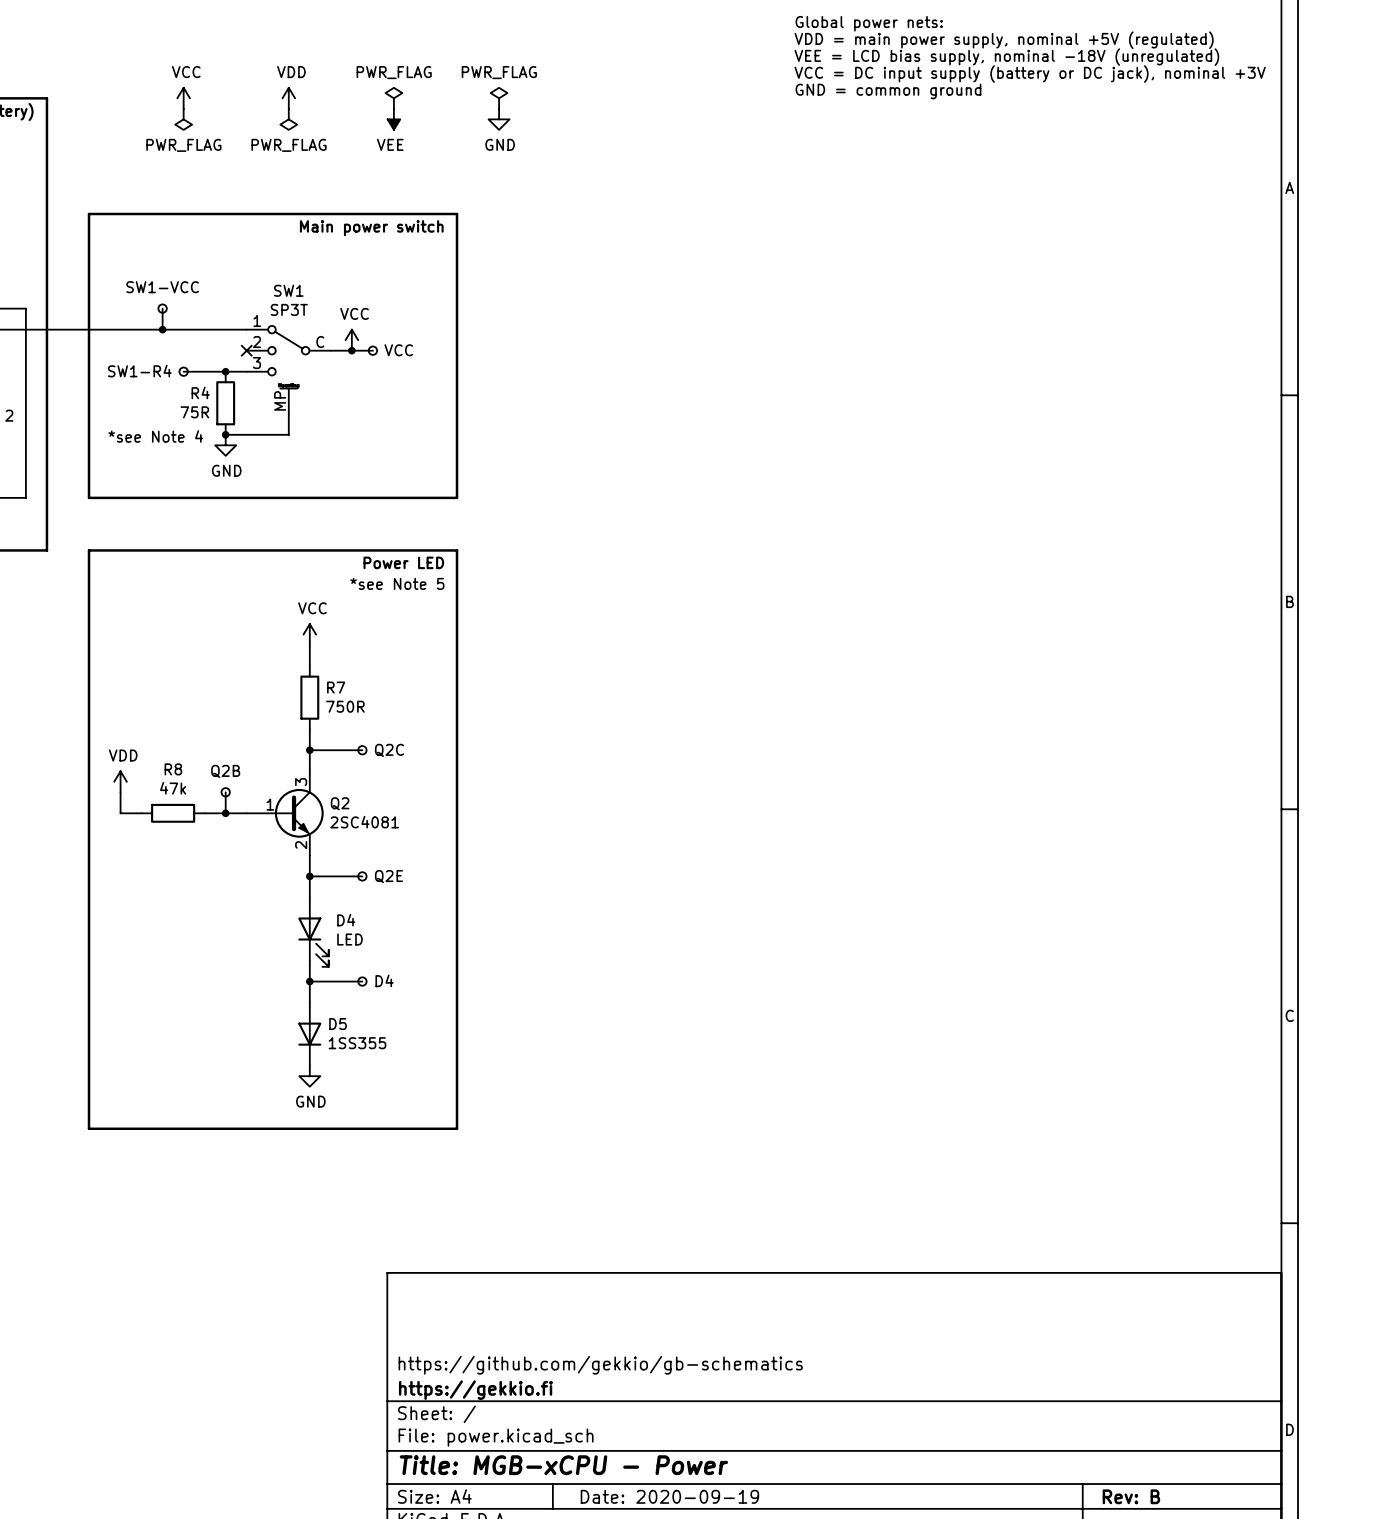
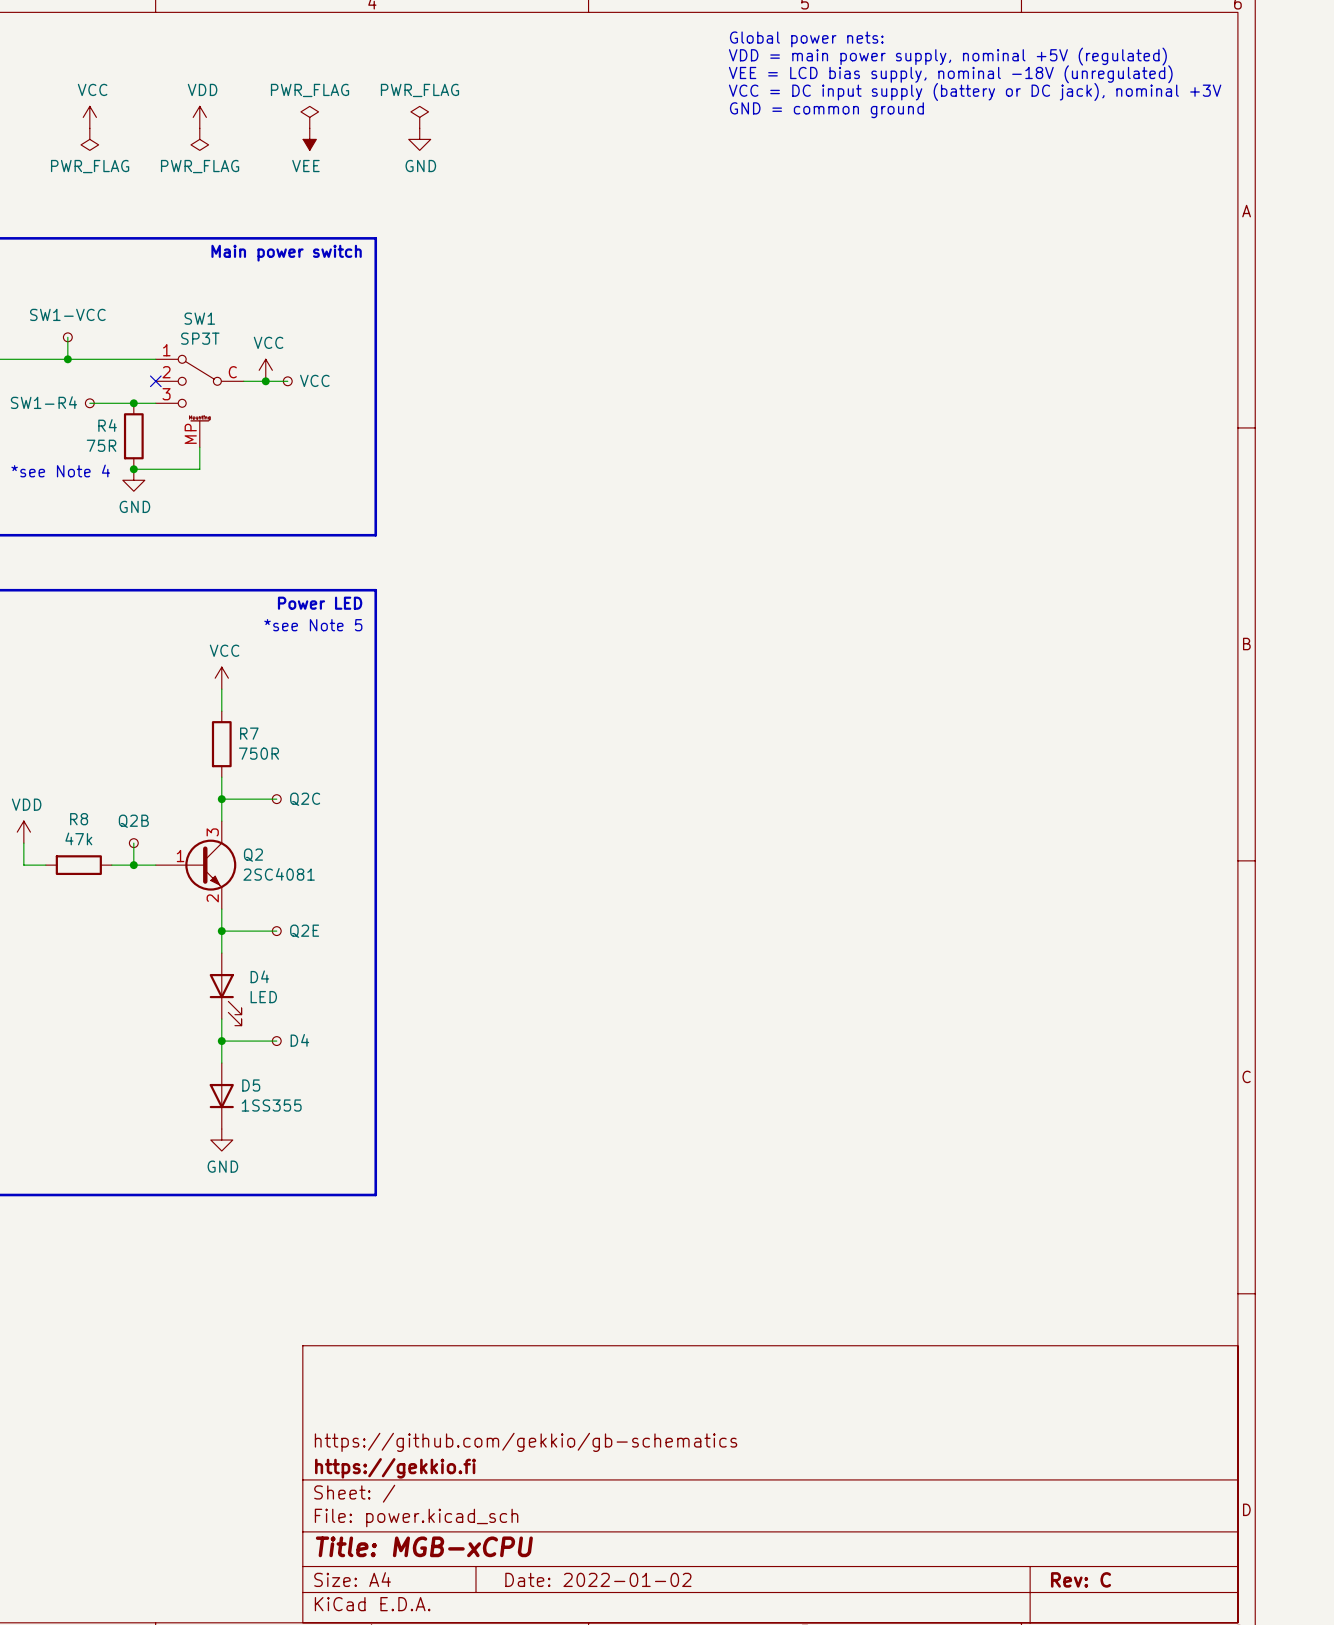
title block: Title: MGB-xCPU - Power (563, 1465) -> Title: MGB-xCPU (424, 1546)
title block: Date: 2020-09-19 (669, 1496) -> Date: 2022-01-02 (598, 1579)
title block: Rev: B (1131, 1496) -> Rev: C (1081, 1579)

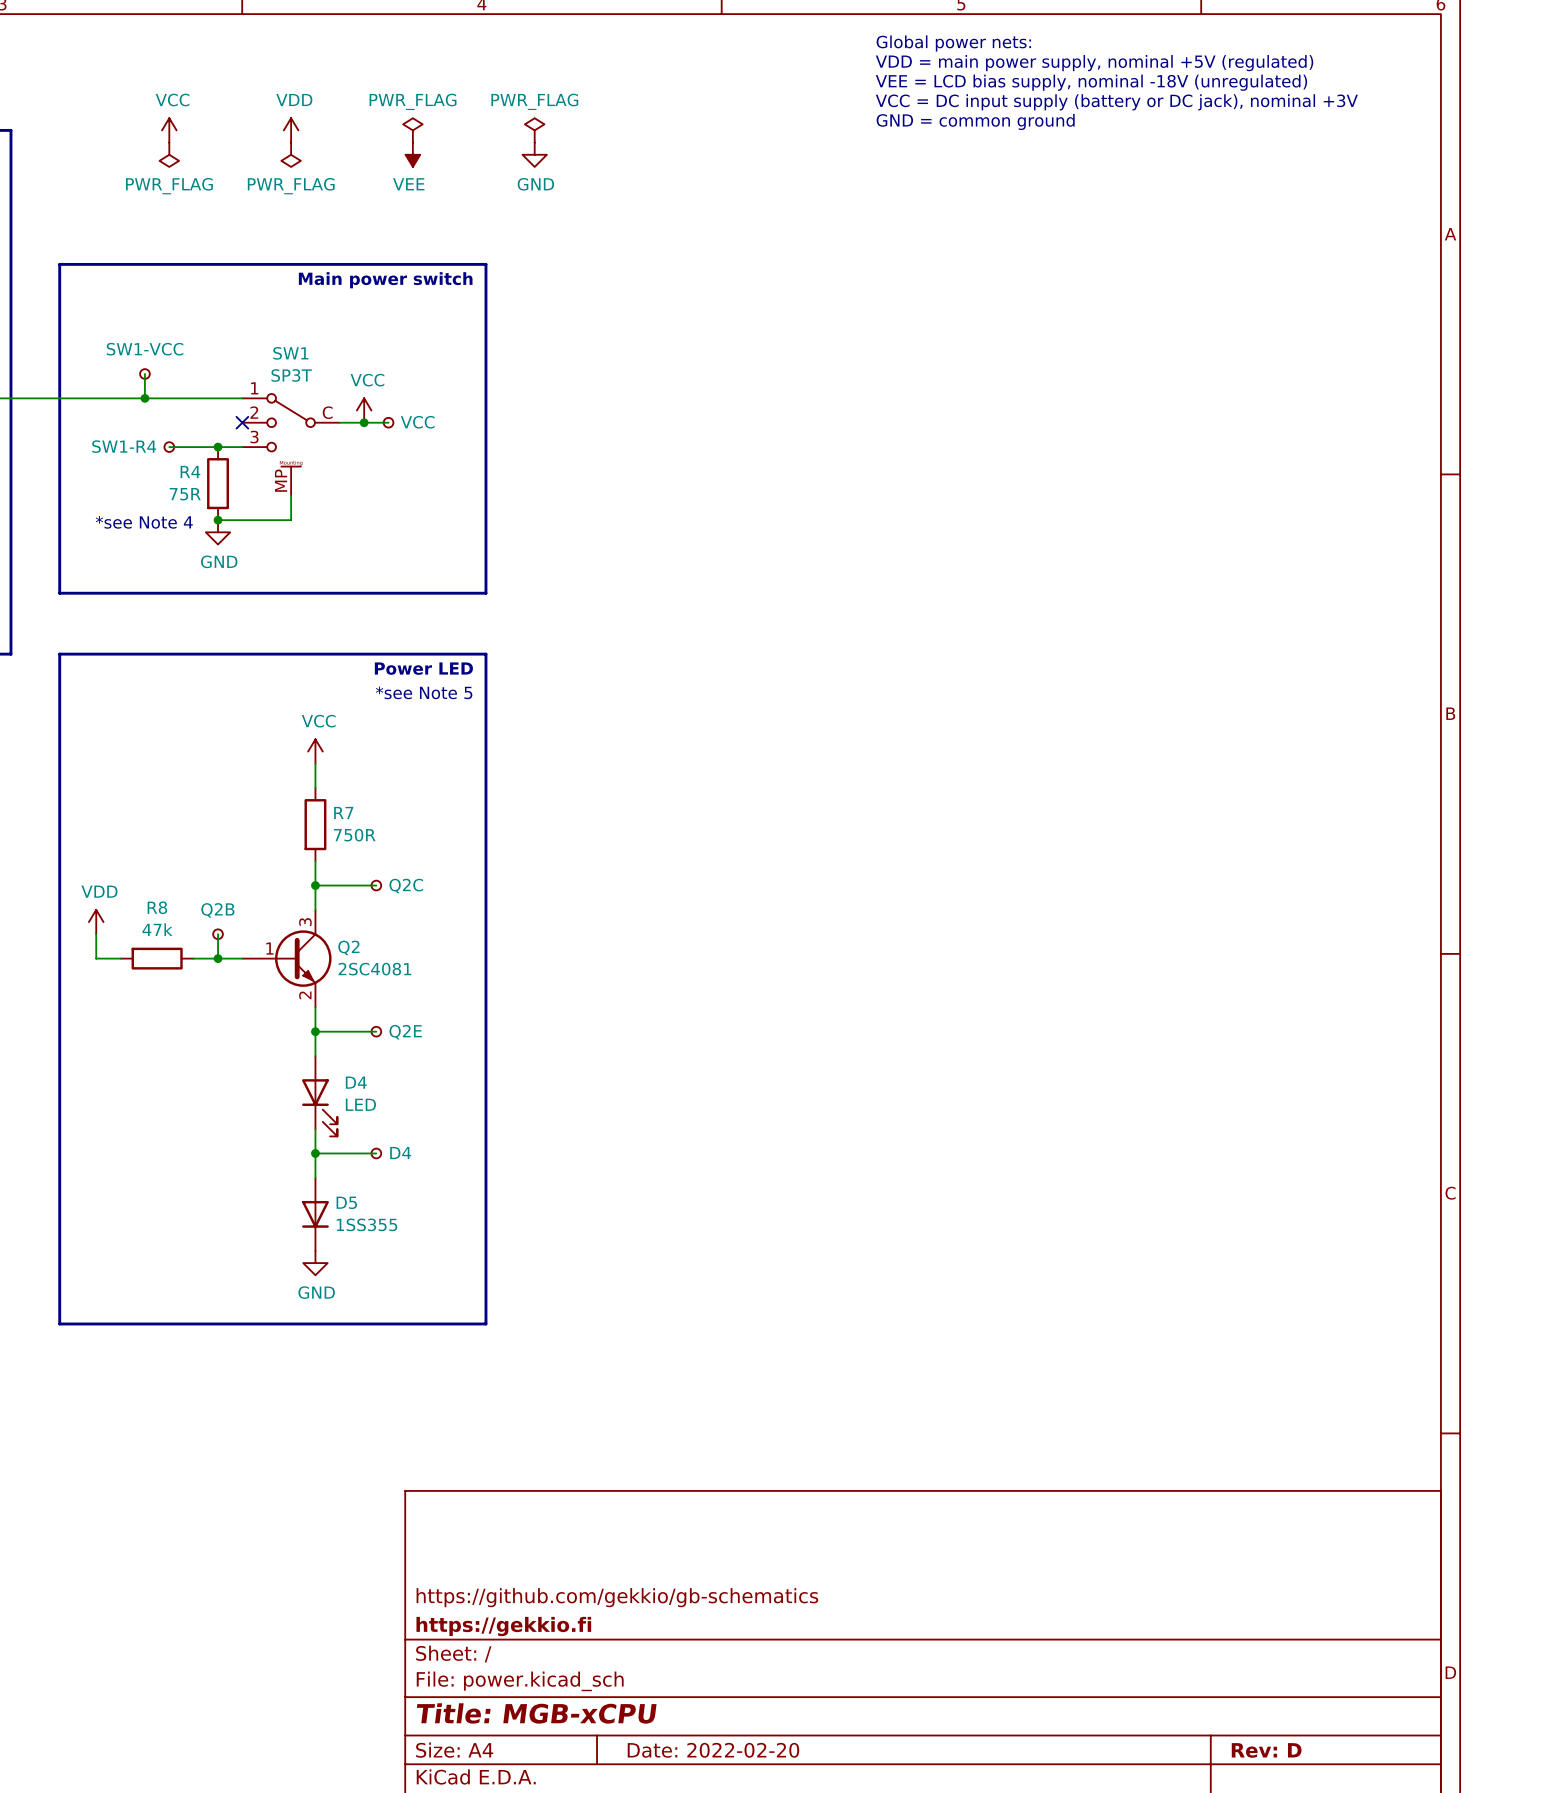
title block: Date: 2022-01-02 (598, 1579) -> Date: 2022-02-20 (713, 1750)
title block: Rev: C (1081, 1579) -> Rev: D (1266, 1750)

